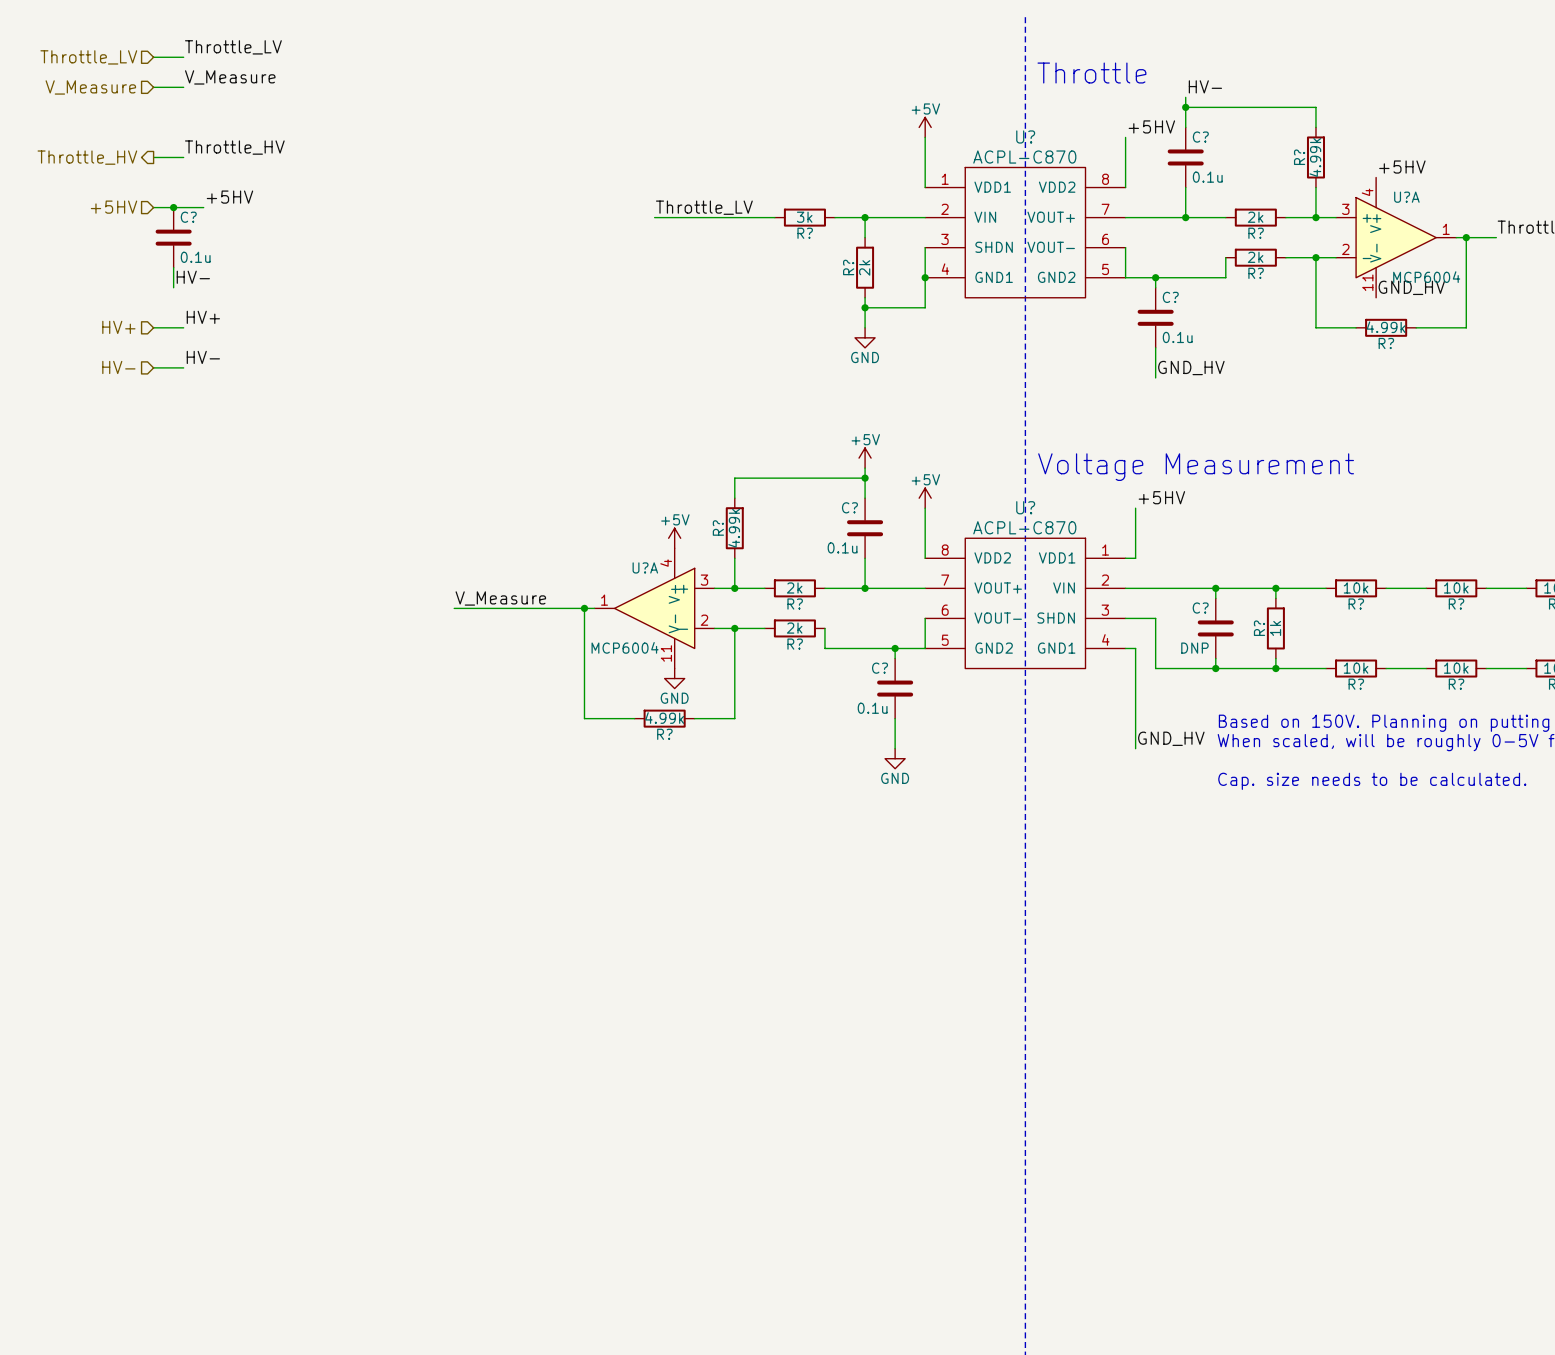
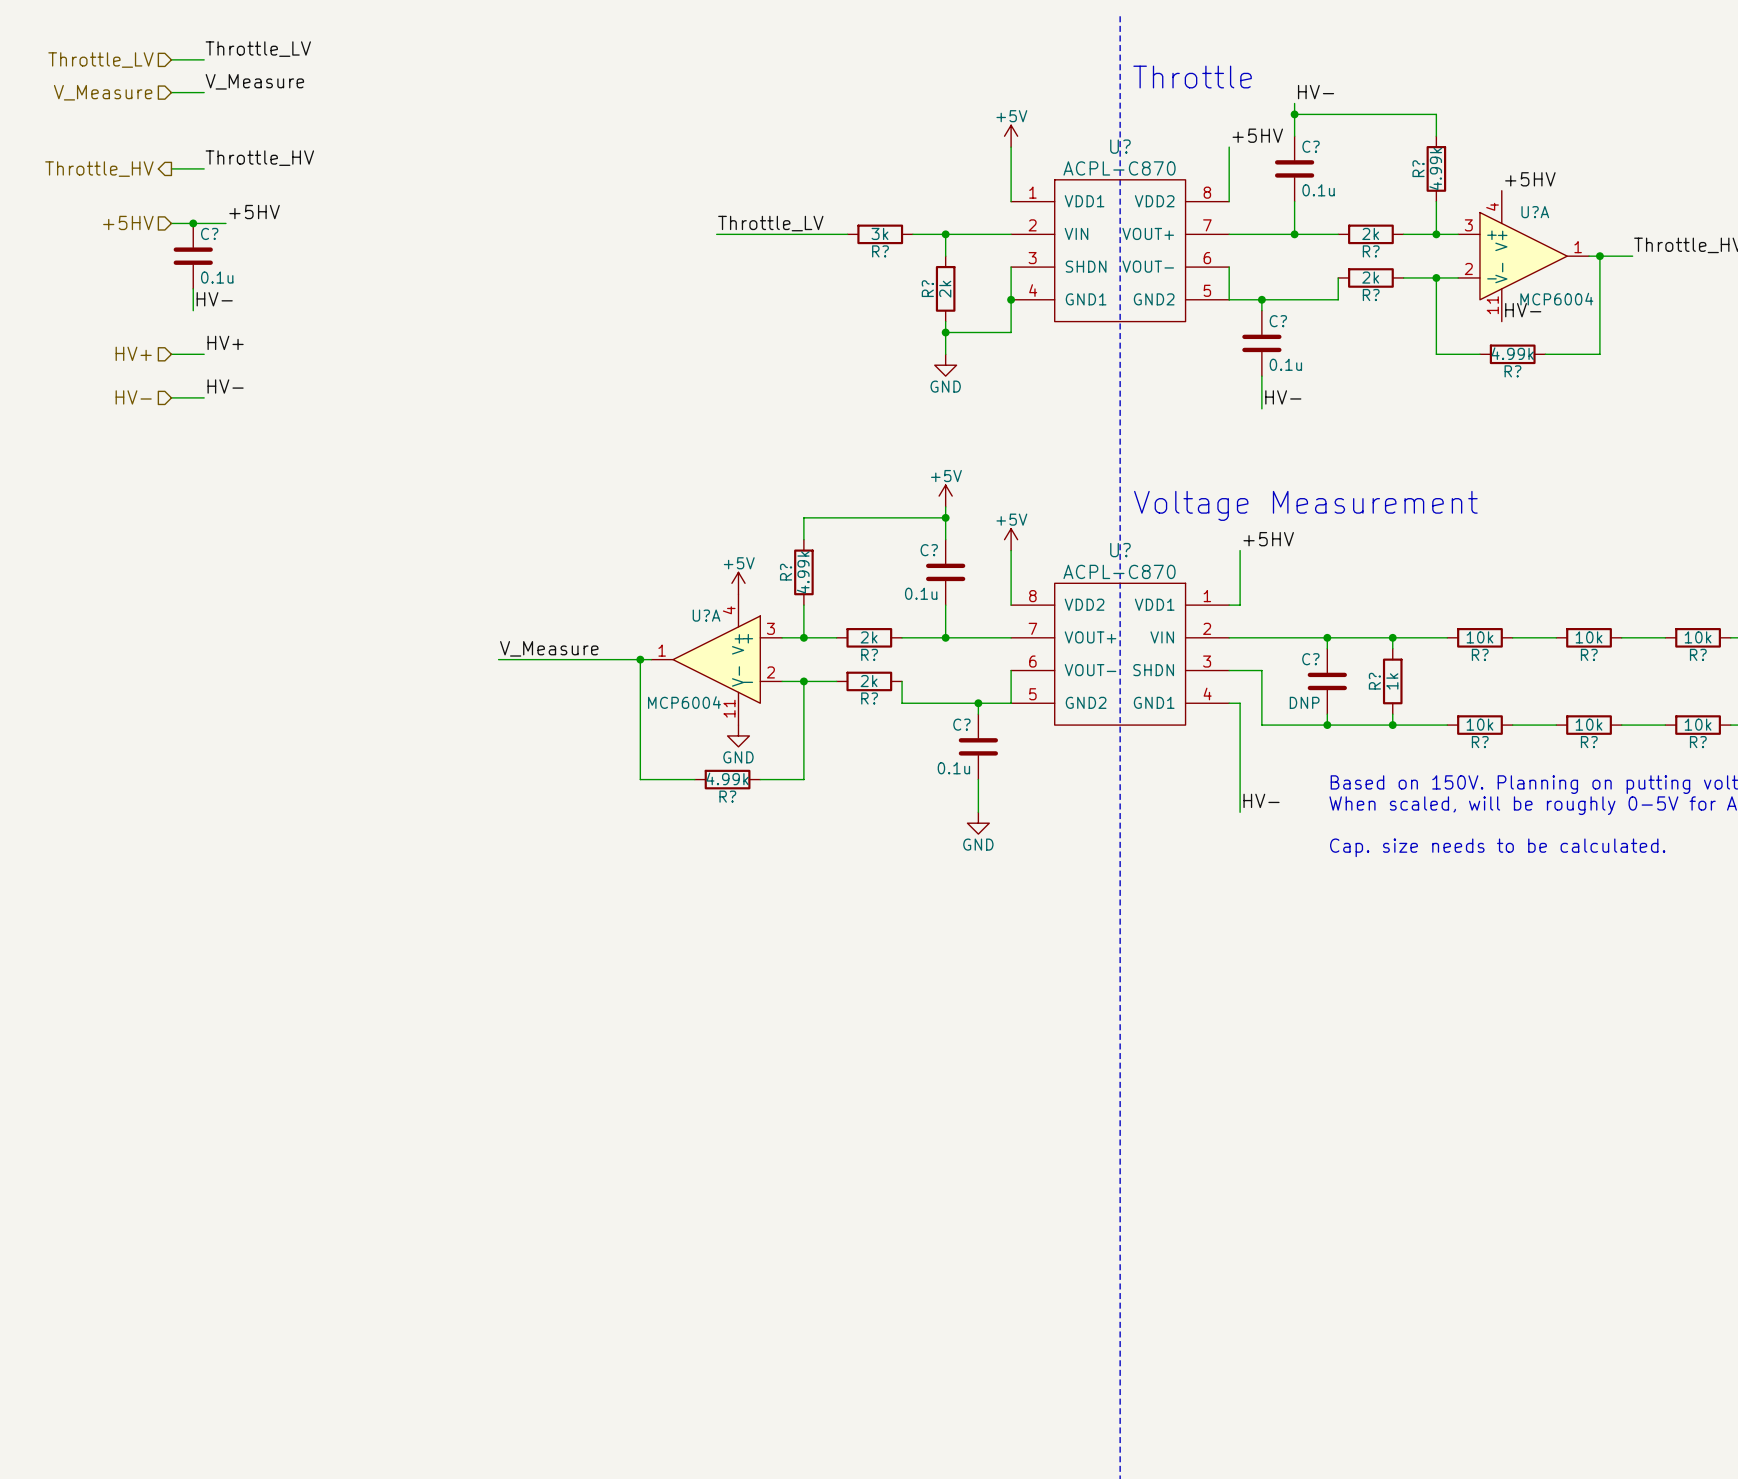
label: GND_HV (1411, 287) -> HV- (1523, 310)
label: GND_HV (1191, 368) -> HV- (1283, 397)
label: GND_HV (1171, 738) -> HV- (1261, 800)

